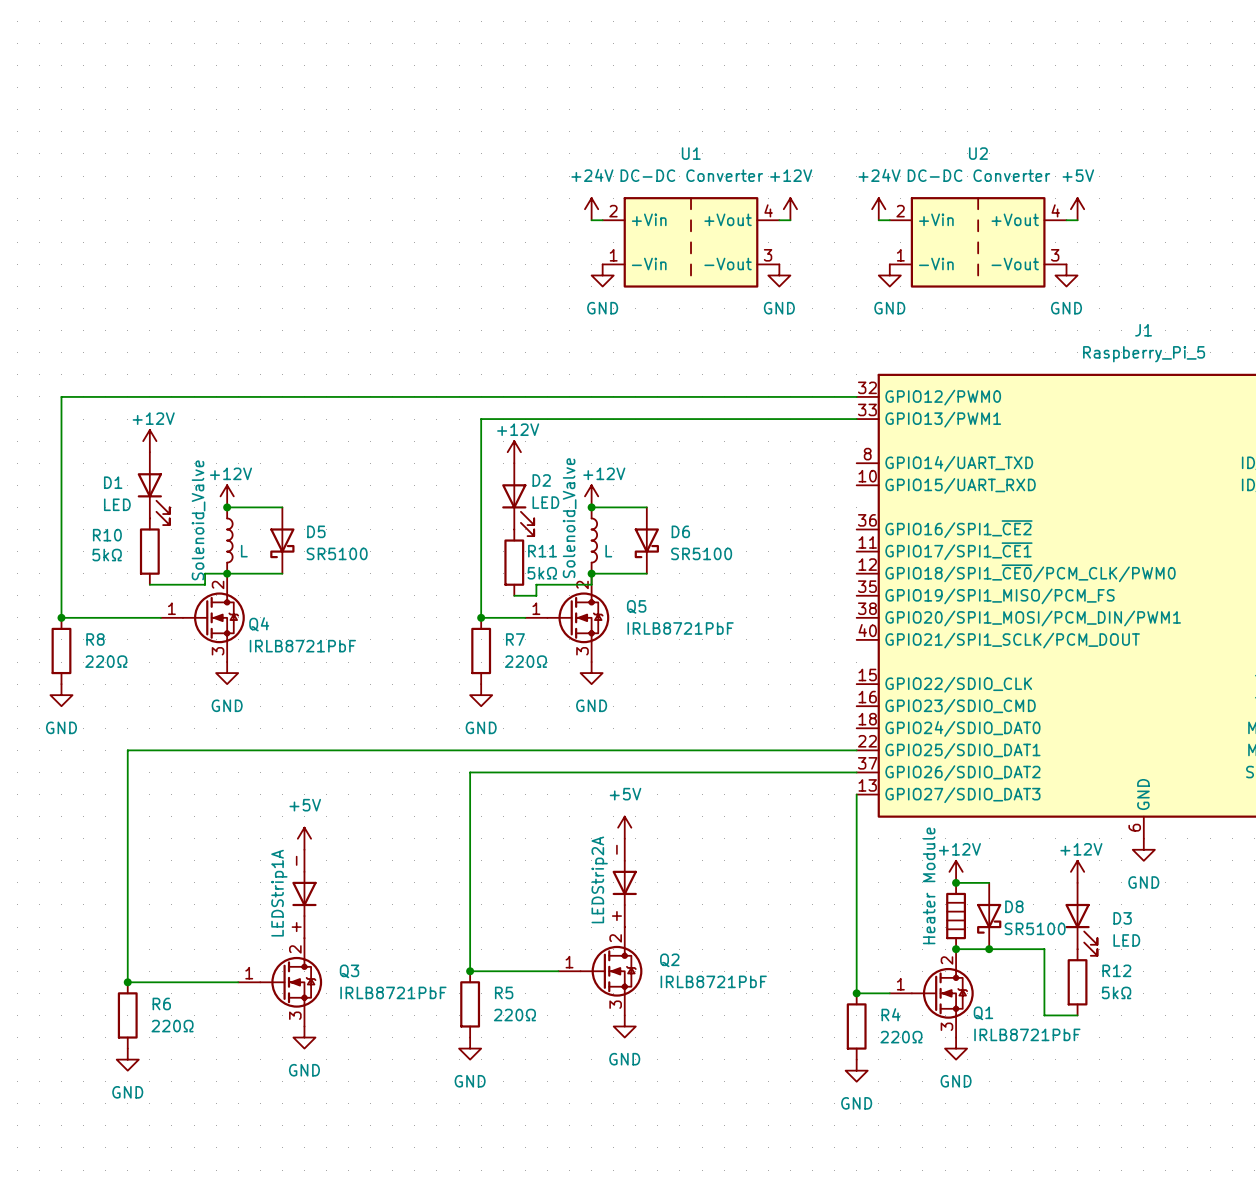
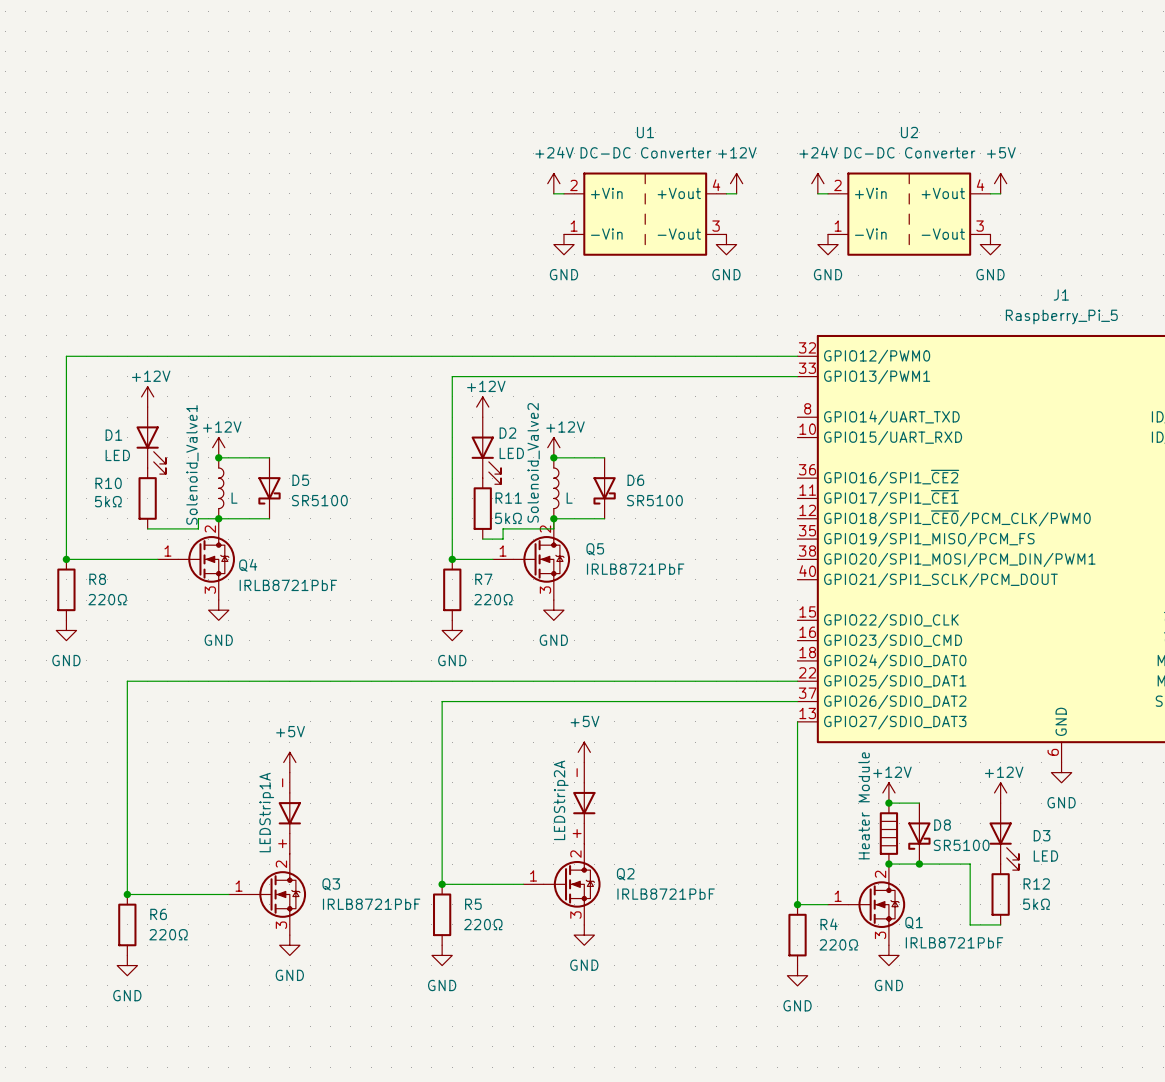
Solenoid_Valve name: Solenoid_Valve (569, 518) -> Solenoid_Valve2 (533, 462)
Solenoid_Valve name: Solenoid_Valve (198, 520) -> Solenoid_Valve1 (192, 464)

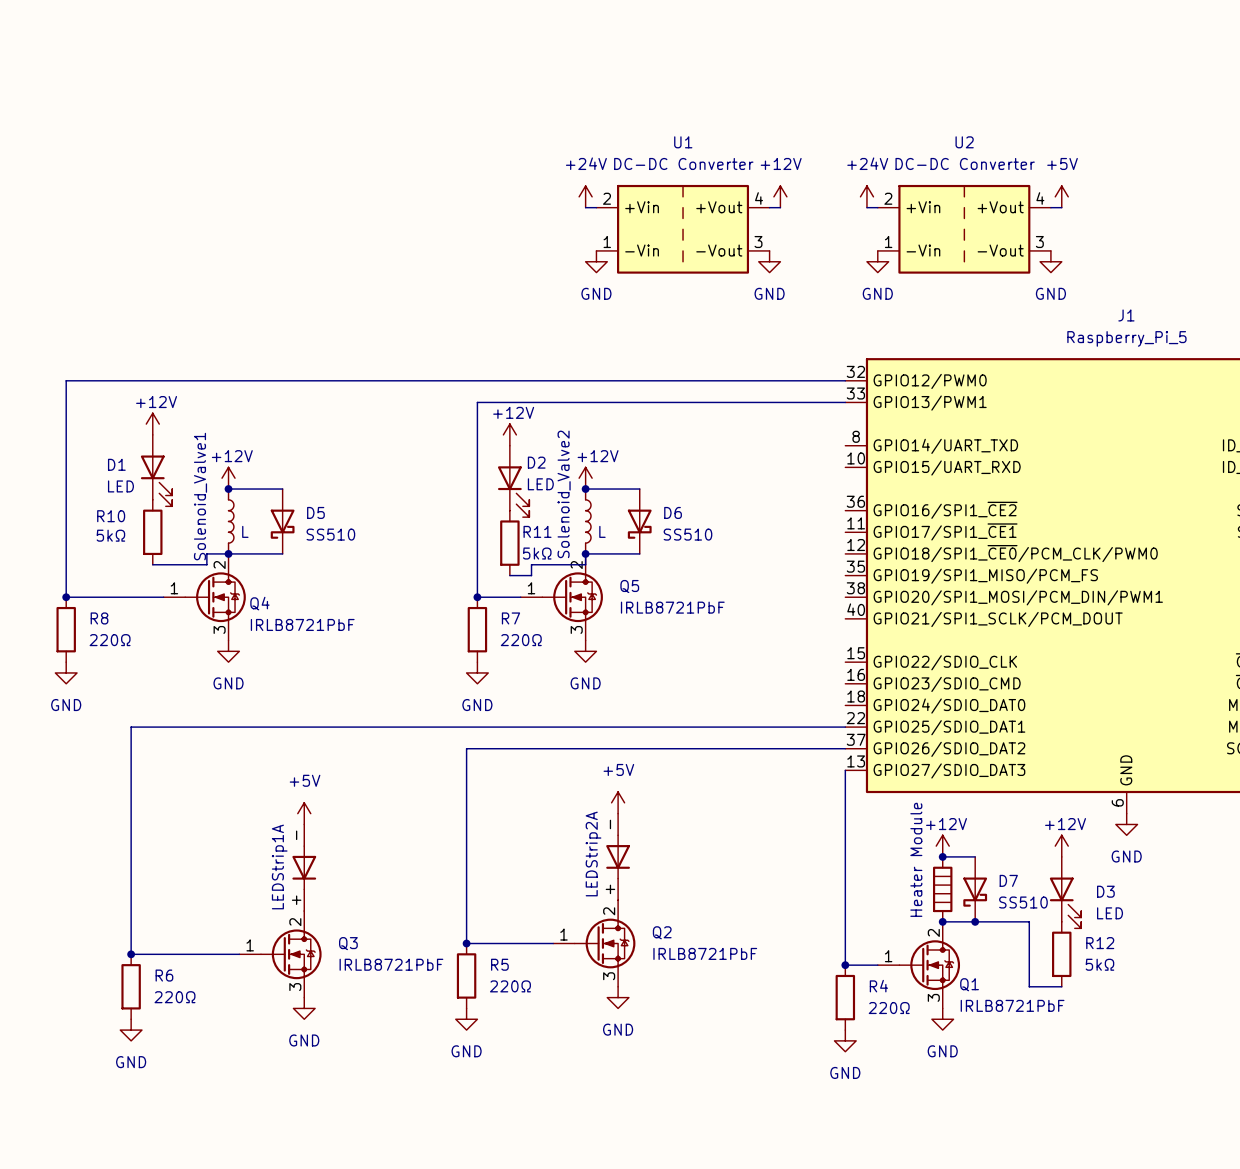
D5 value: SR5100 (319, 500) -> SS510 (330, 534)
D6 value: SR5100 (654, 500) -> SS510 (687, 534)
D8 name: D8 (942, 825) -> D7 (1008, 880)
D8 value: SR5100 (961, 845) -> SS510 (1023, 902)

